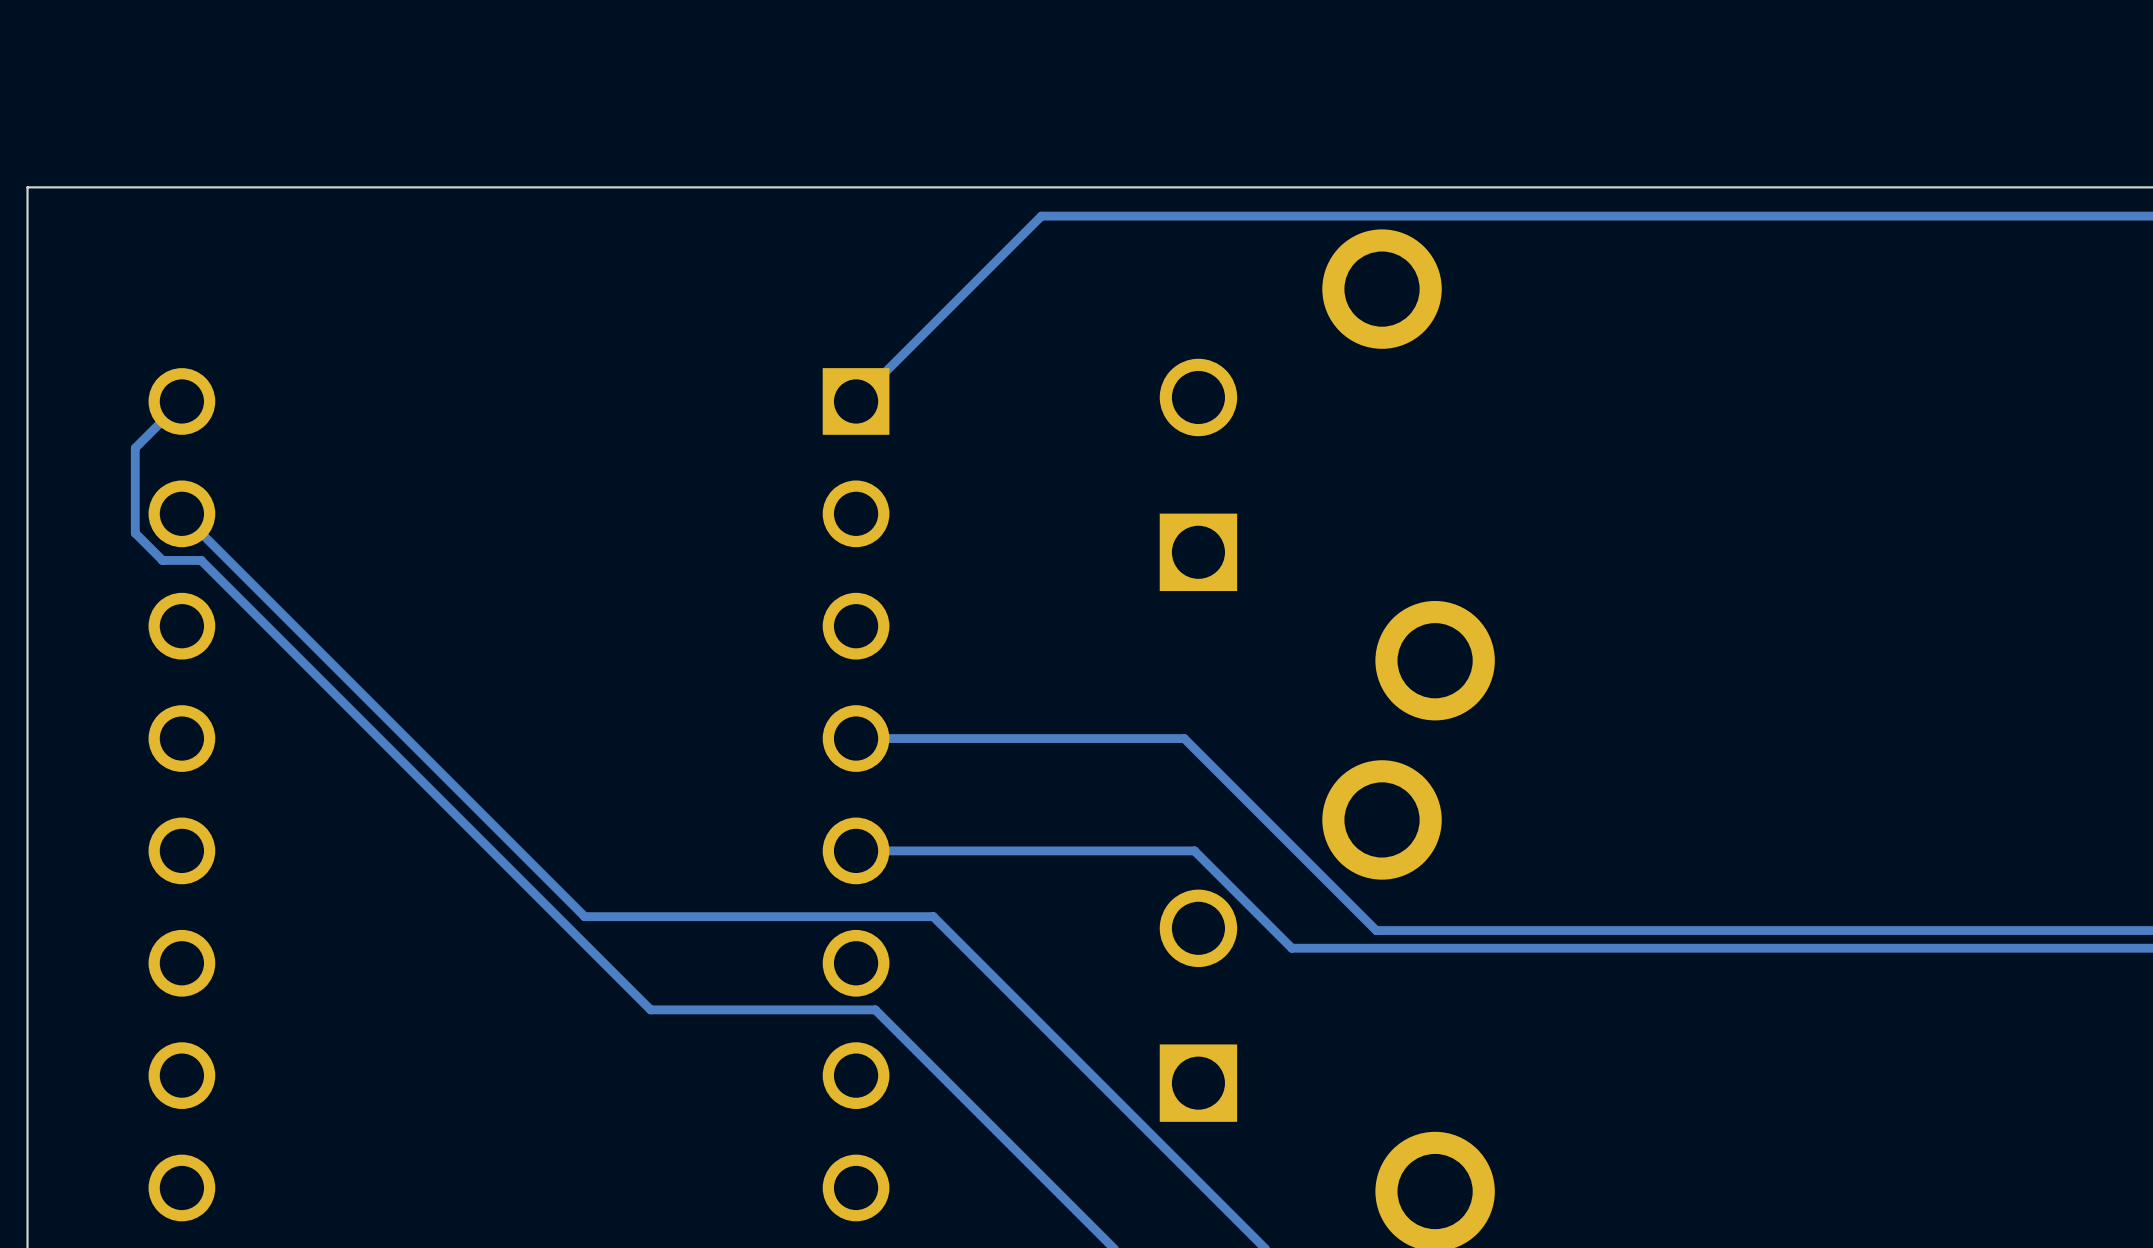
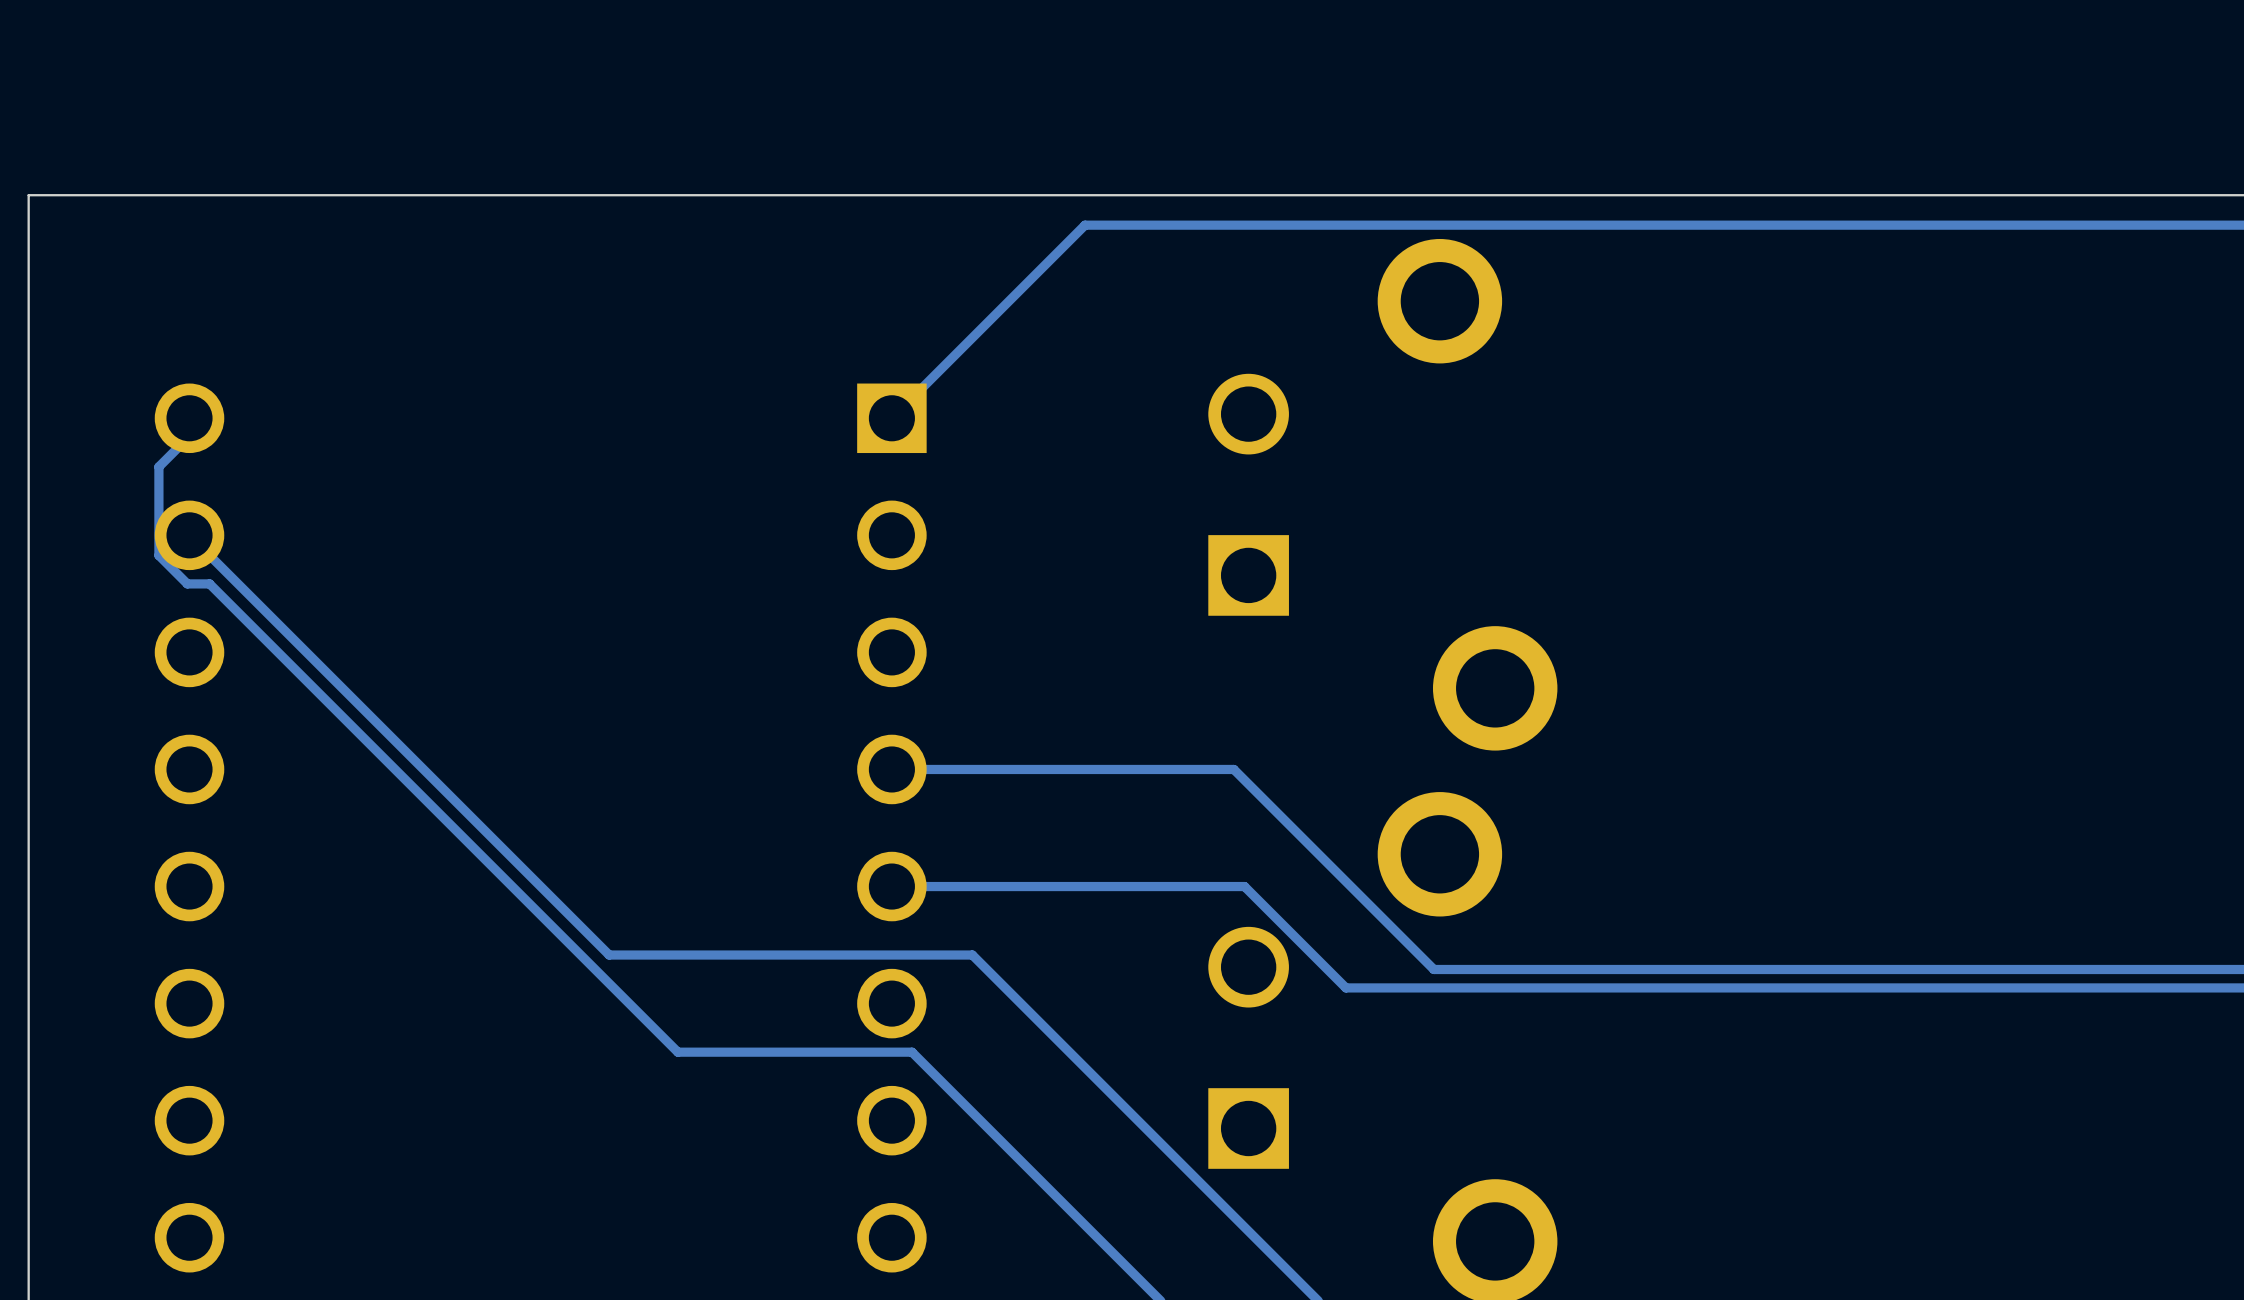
track: (181, 401) (135, 448) (135, 533) (162, 560) (179, 560) -> (189, 418) (207, 418) (158, 466) (158, 555) (187, 583)

